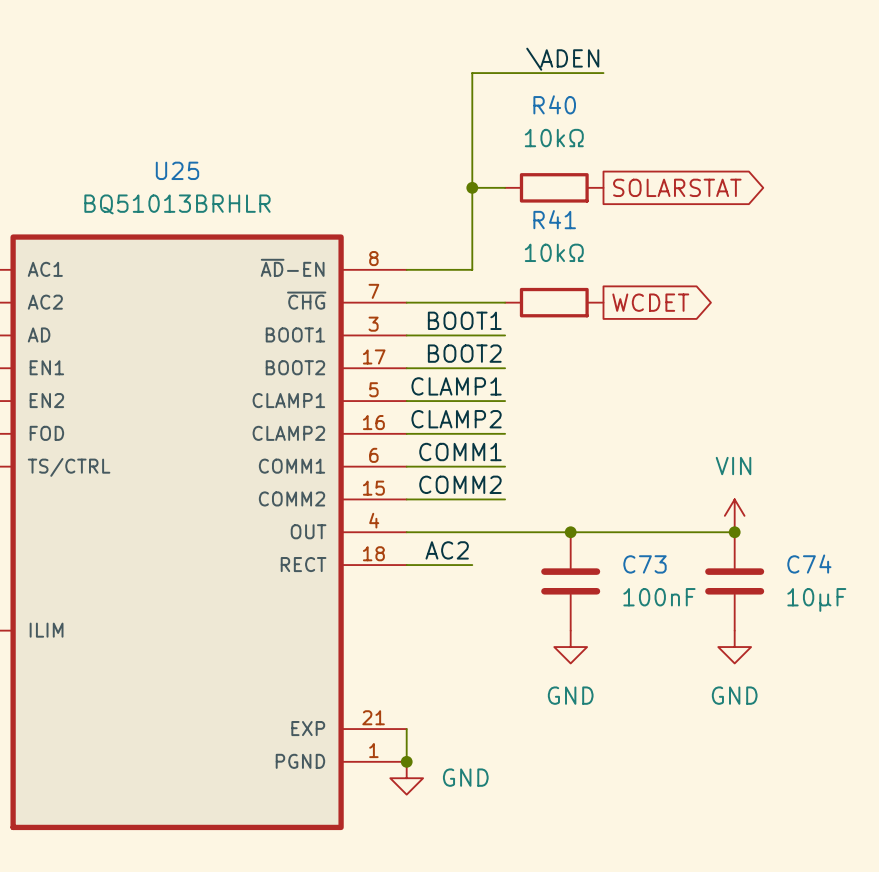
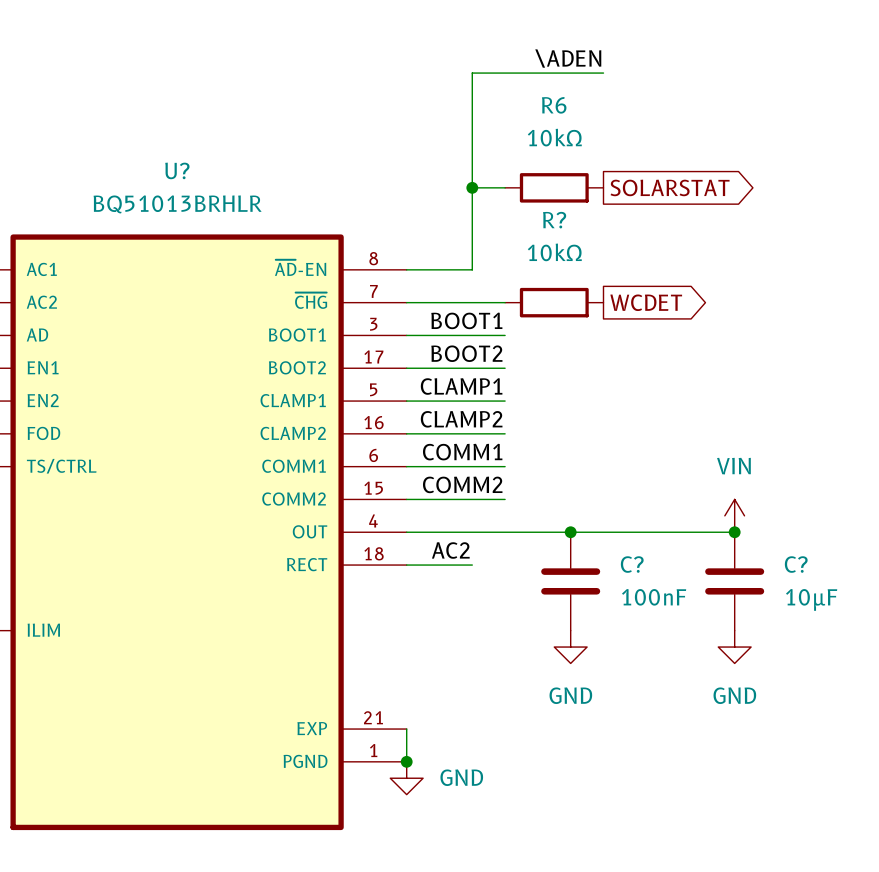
R40 name: R40 (554, 104) -> R6 (554, 105)
U25 name: U25 (177, 170) -> U? (177, 170)
R41 name: R41 (554, 219) -> R? (554, 220)
C73 name: C73 (645, 564) -> C? (632, 564)
C74 name: C74 (809, 564) -> C? (796, 564)

